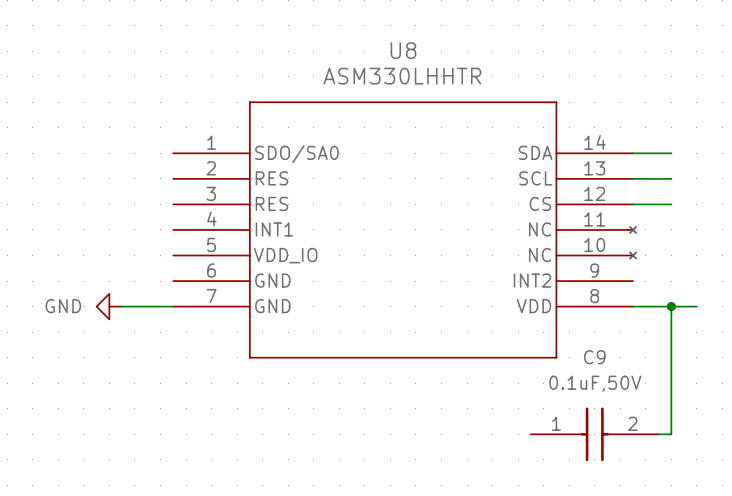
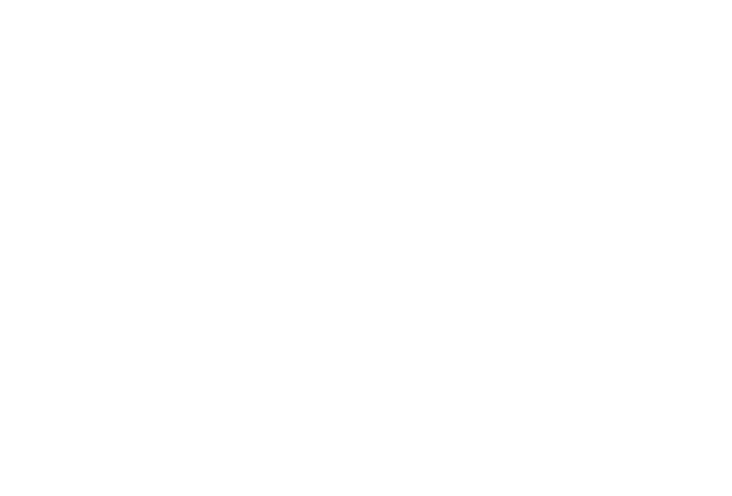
wire: (633, 153) (671, 153) -> none
wire: (633, 178) (671, 178) -> none
wire: (633, 204) (671, 204) -> none
U8: ASM330LHHTR (404, 229) -> none
power symbol: GND (109, 306) -> none
wire: (122, 306) (173, 306) -> none
wire: (633, 306) (696, 306) -> none
wire: (671, 306) (671, 434) (658, 434) -> none
junction: (671, 306) -> none
C9: 0.1uF,50V (594, 434) -> none

